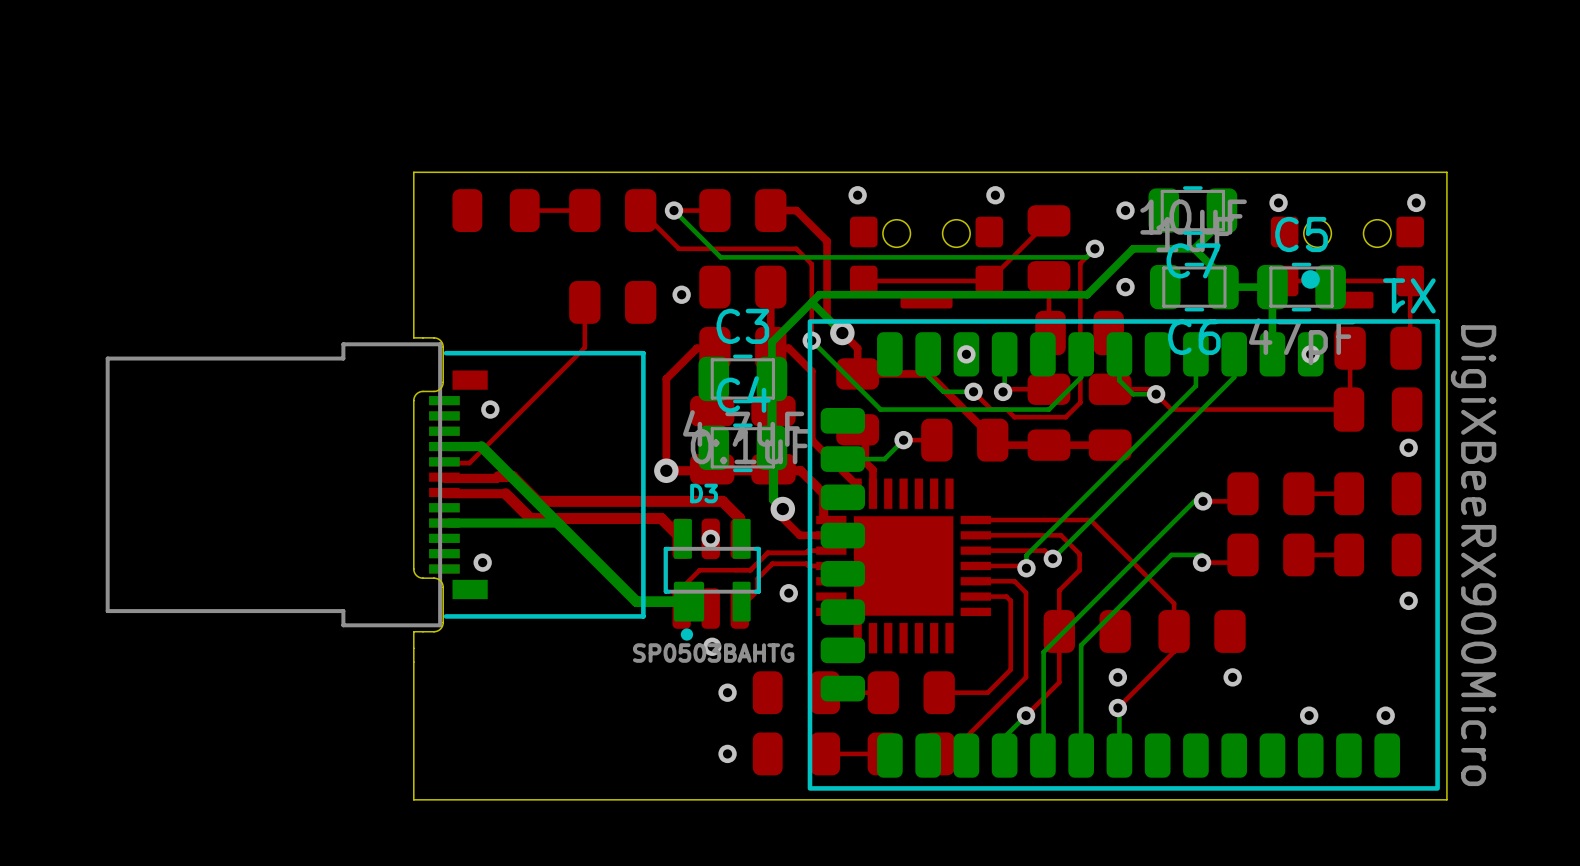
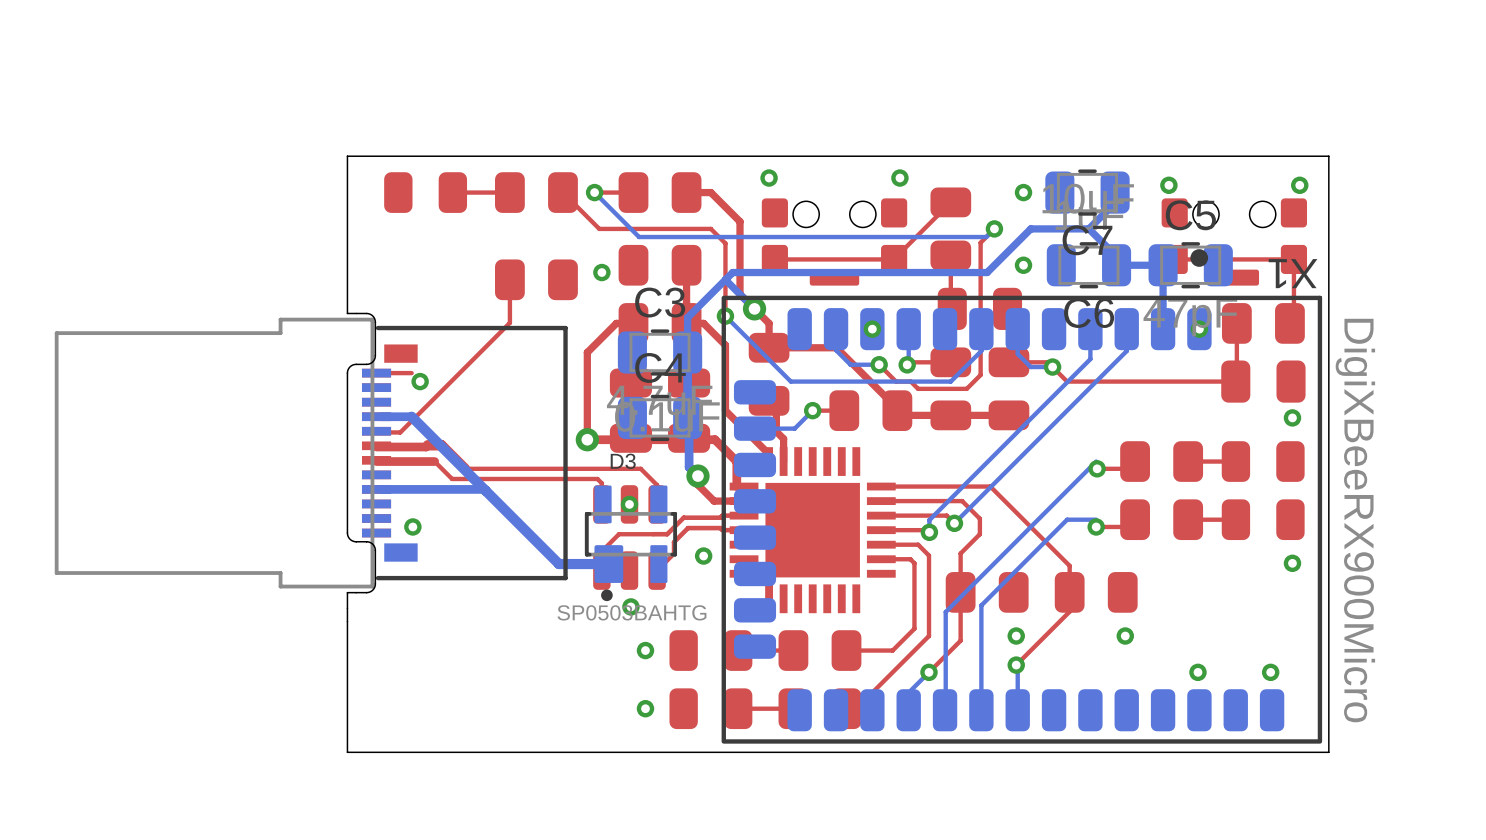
top track: none -> (411, 373) (376, 373)
top track width: thick (505, 493) (524, 512) -> thin (434, 461) (452, 478)
top track width: thick (537, 501) (722, 501) (739, 518) (739, 538) -> thin (464, 468) (640, 468) (657, 485) (657, 504)
top track: (524, 512) (530, 518) (661, 518) (681, 538) -> (452, 478) (597, 478) (601, 483) (601, 504)

